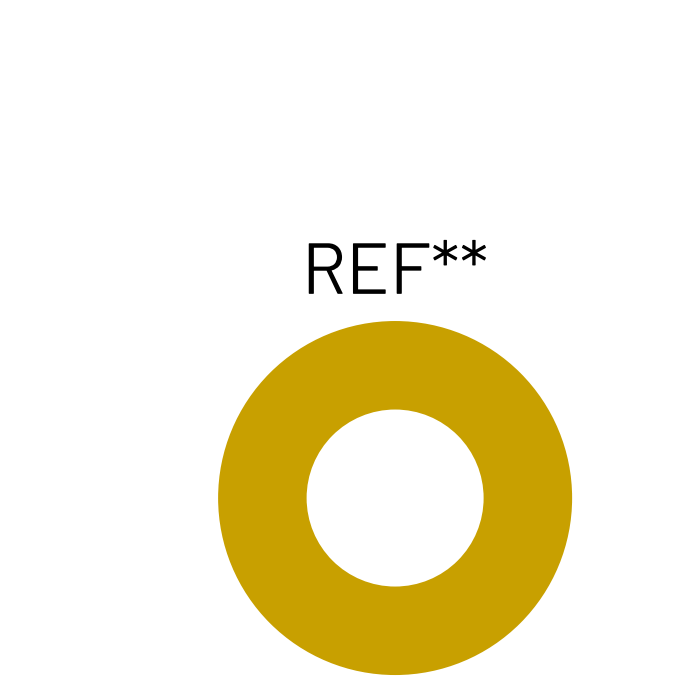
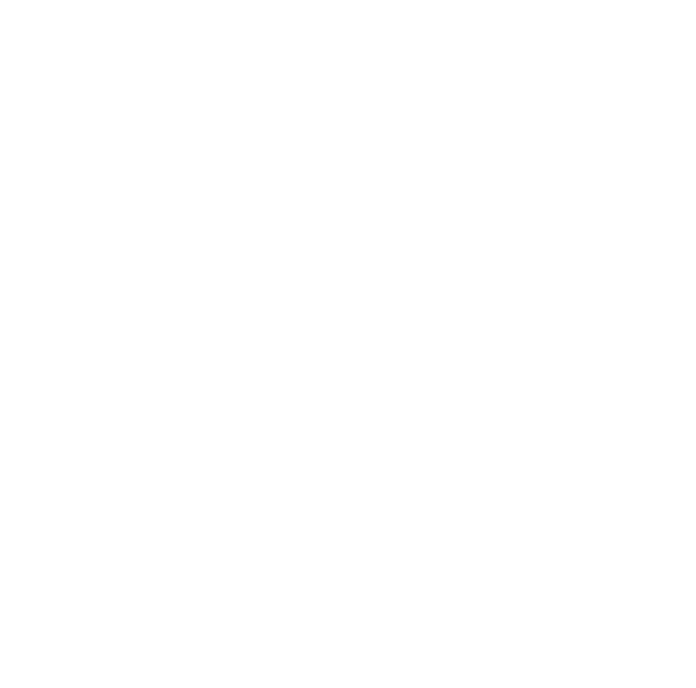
REF**: (395, 498) -> none

